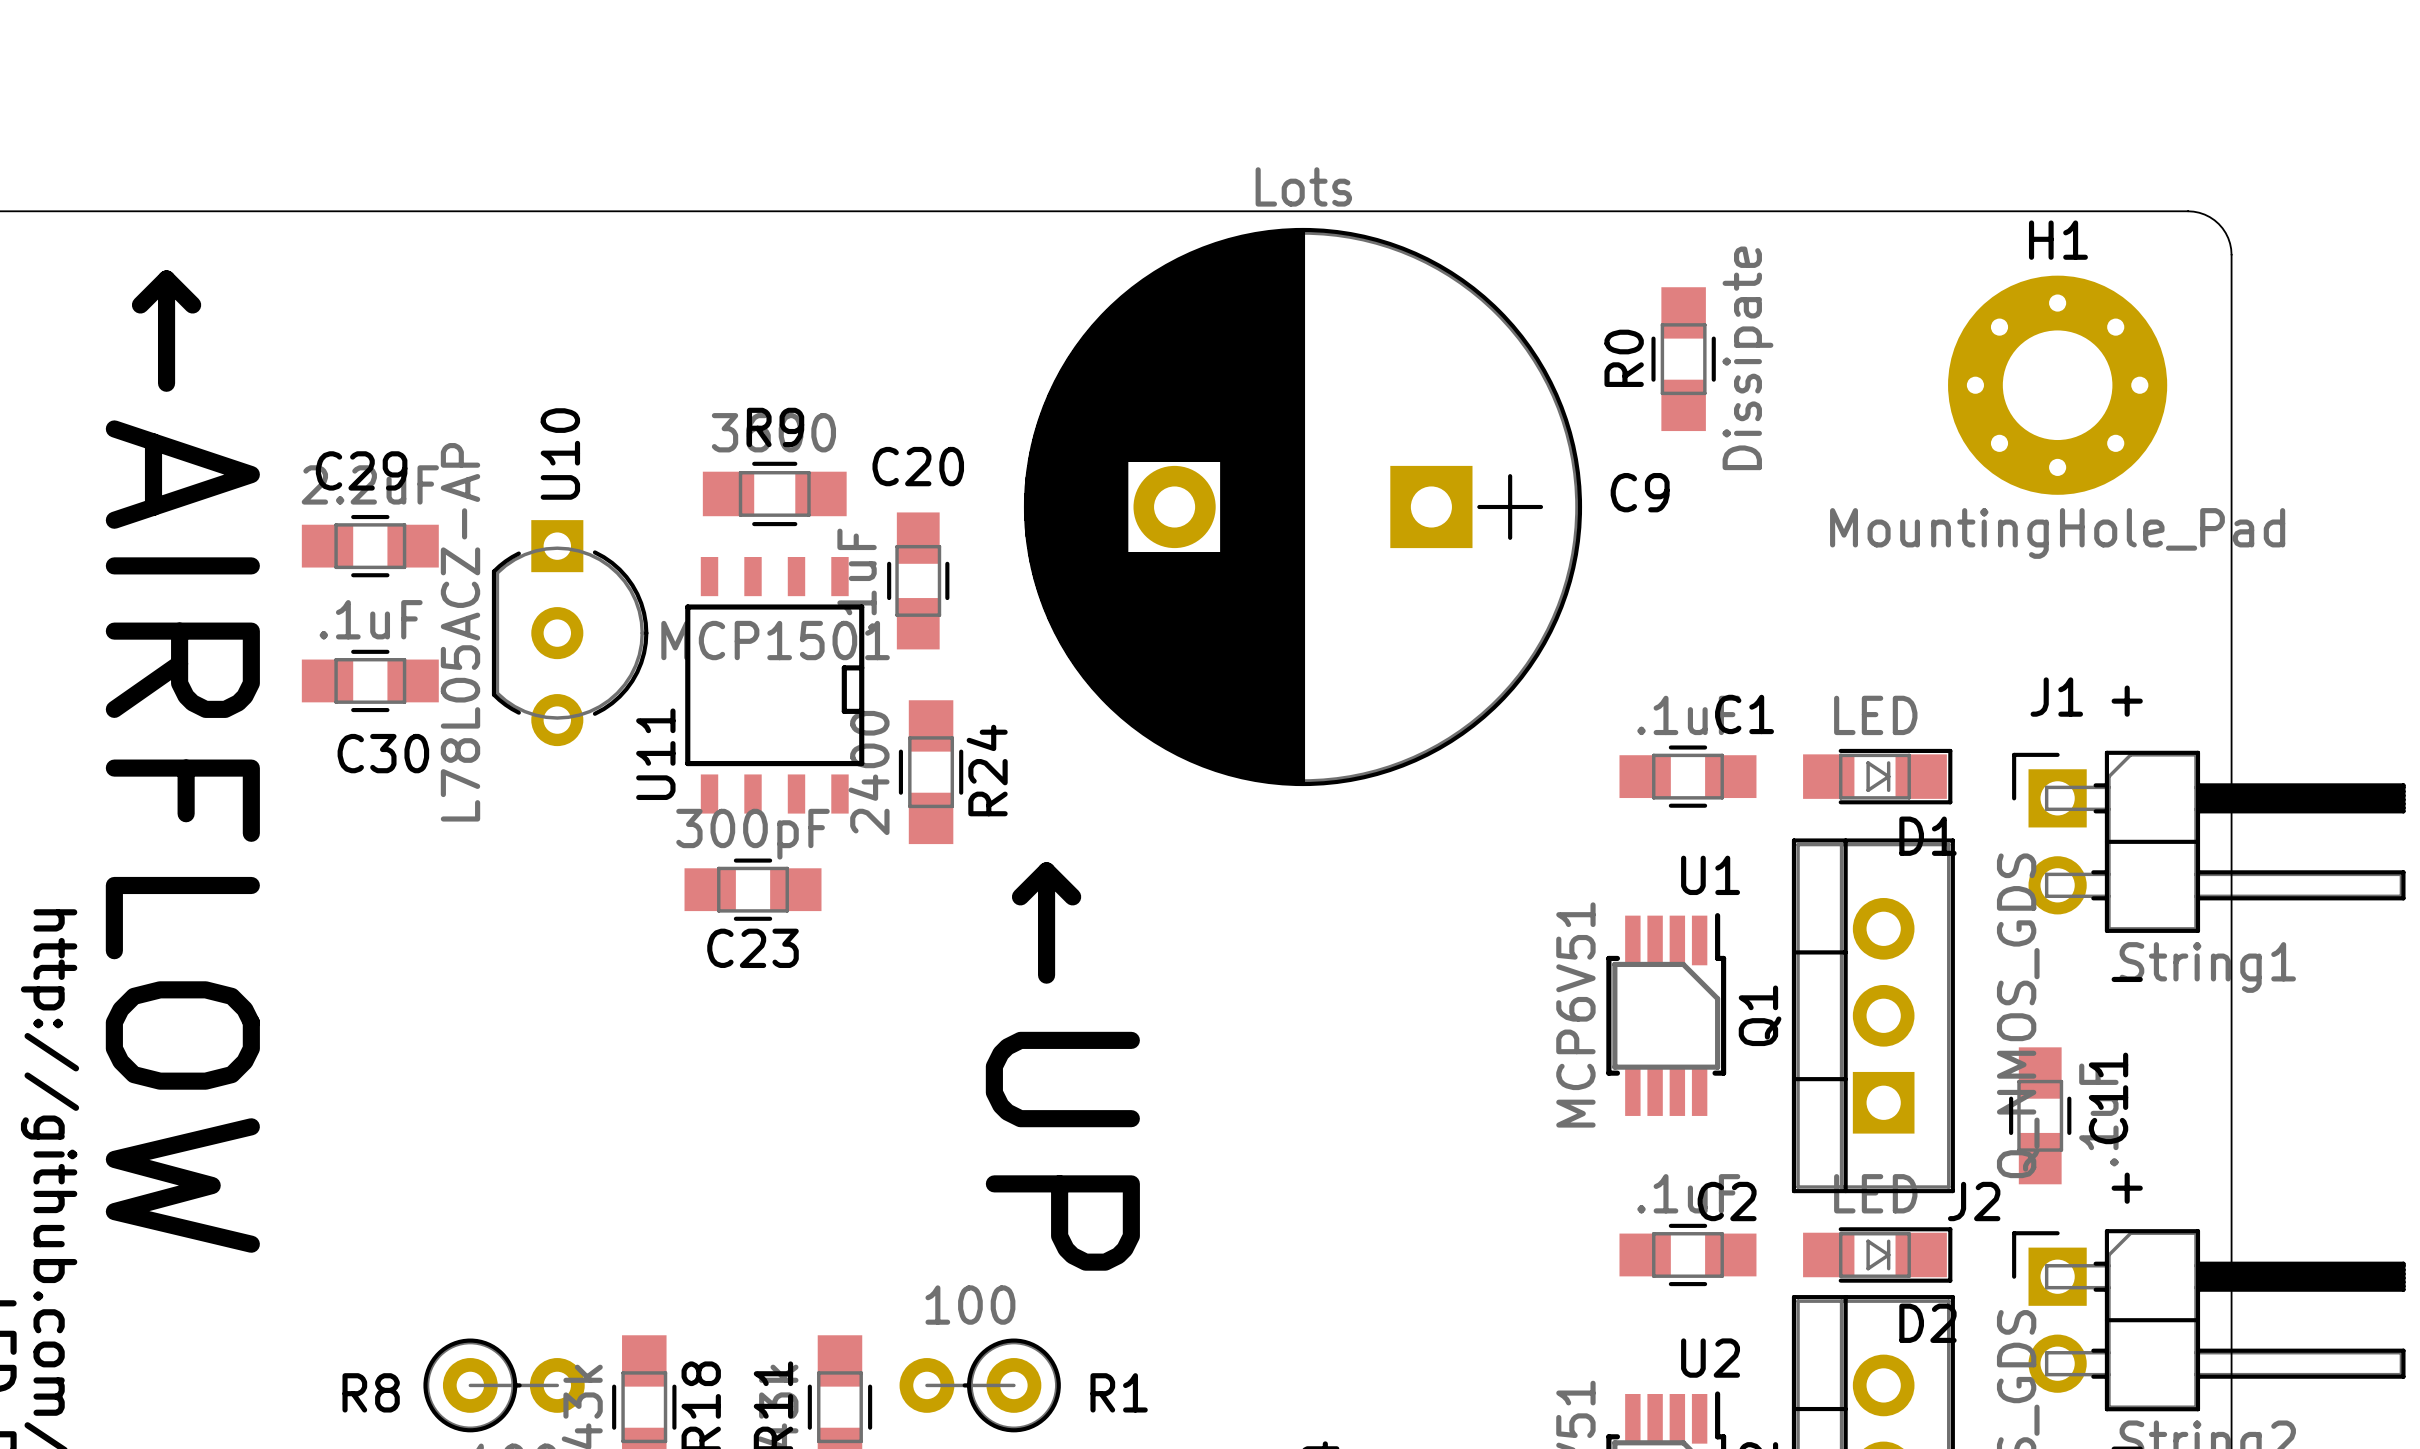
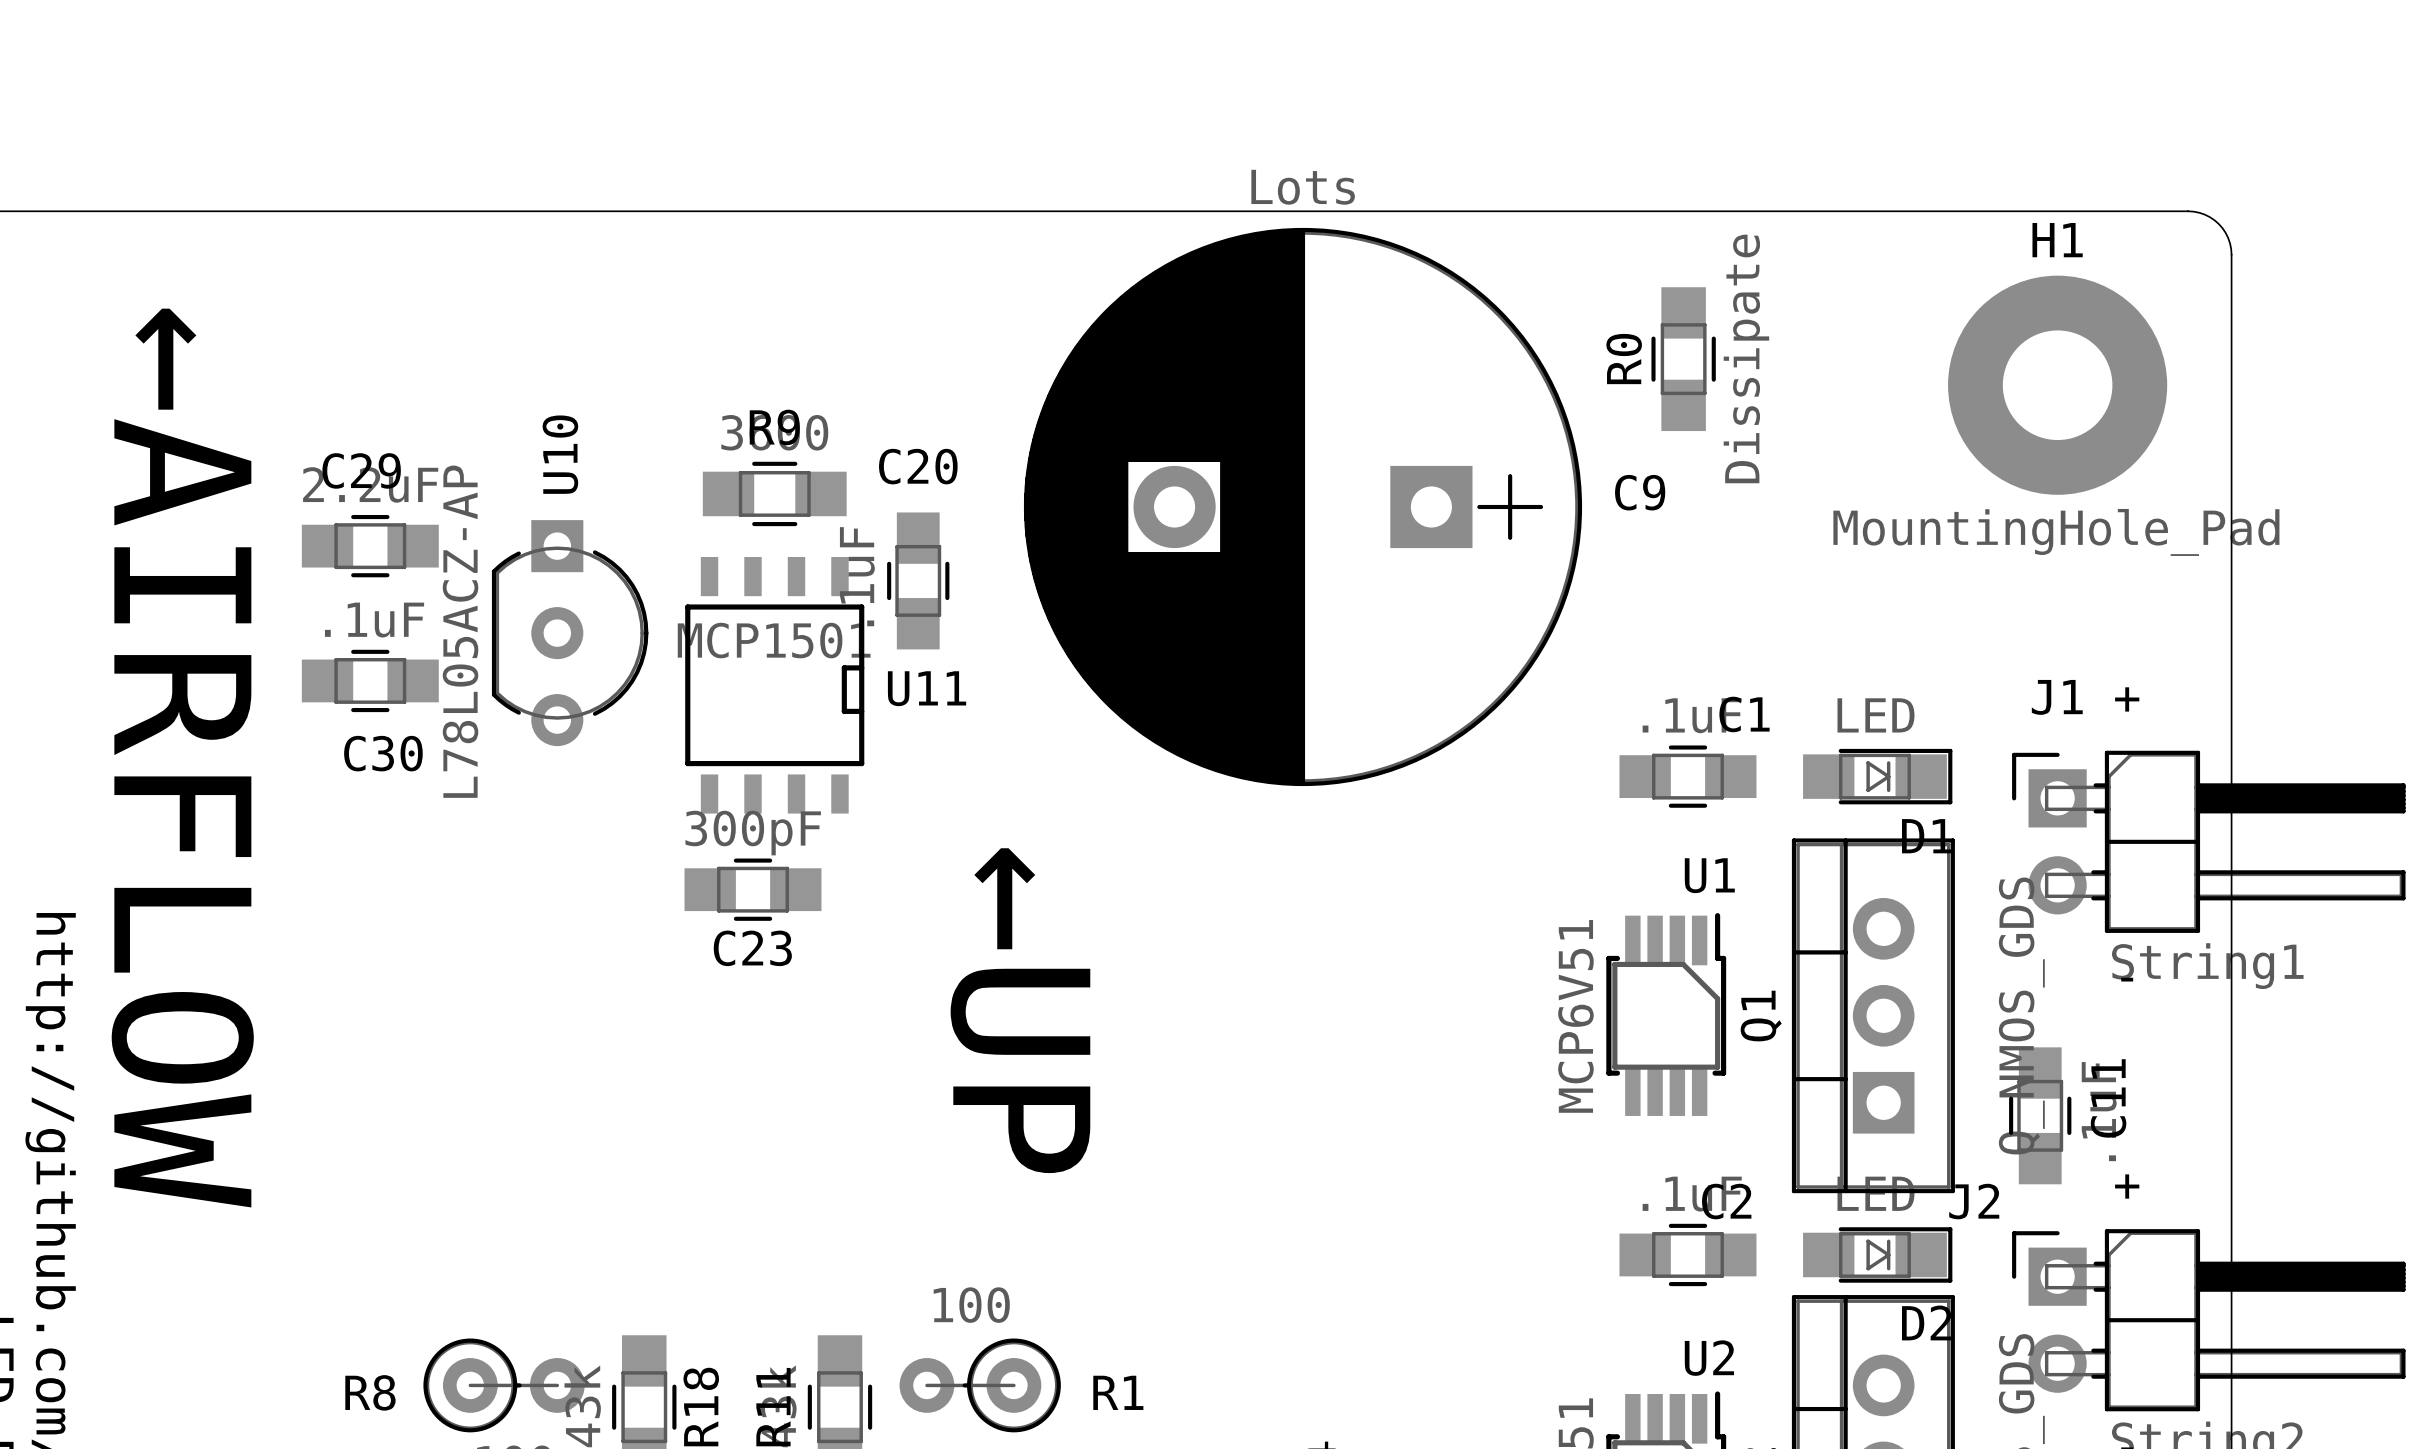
H1 footprint: [1948, 275, 2168, 495] -> [1948, 275, 2168, 495]
U11 name rotation: 0° (655, 754) -> 90° clockwise (927, 688)
U11 name position: U11 (655, 754) -> U11 (927, 688)
R24: 2400 (931, 772) -> none
text position: ←UP (1062, 1066) -> ←UP (1020, 1010)

